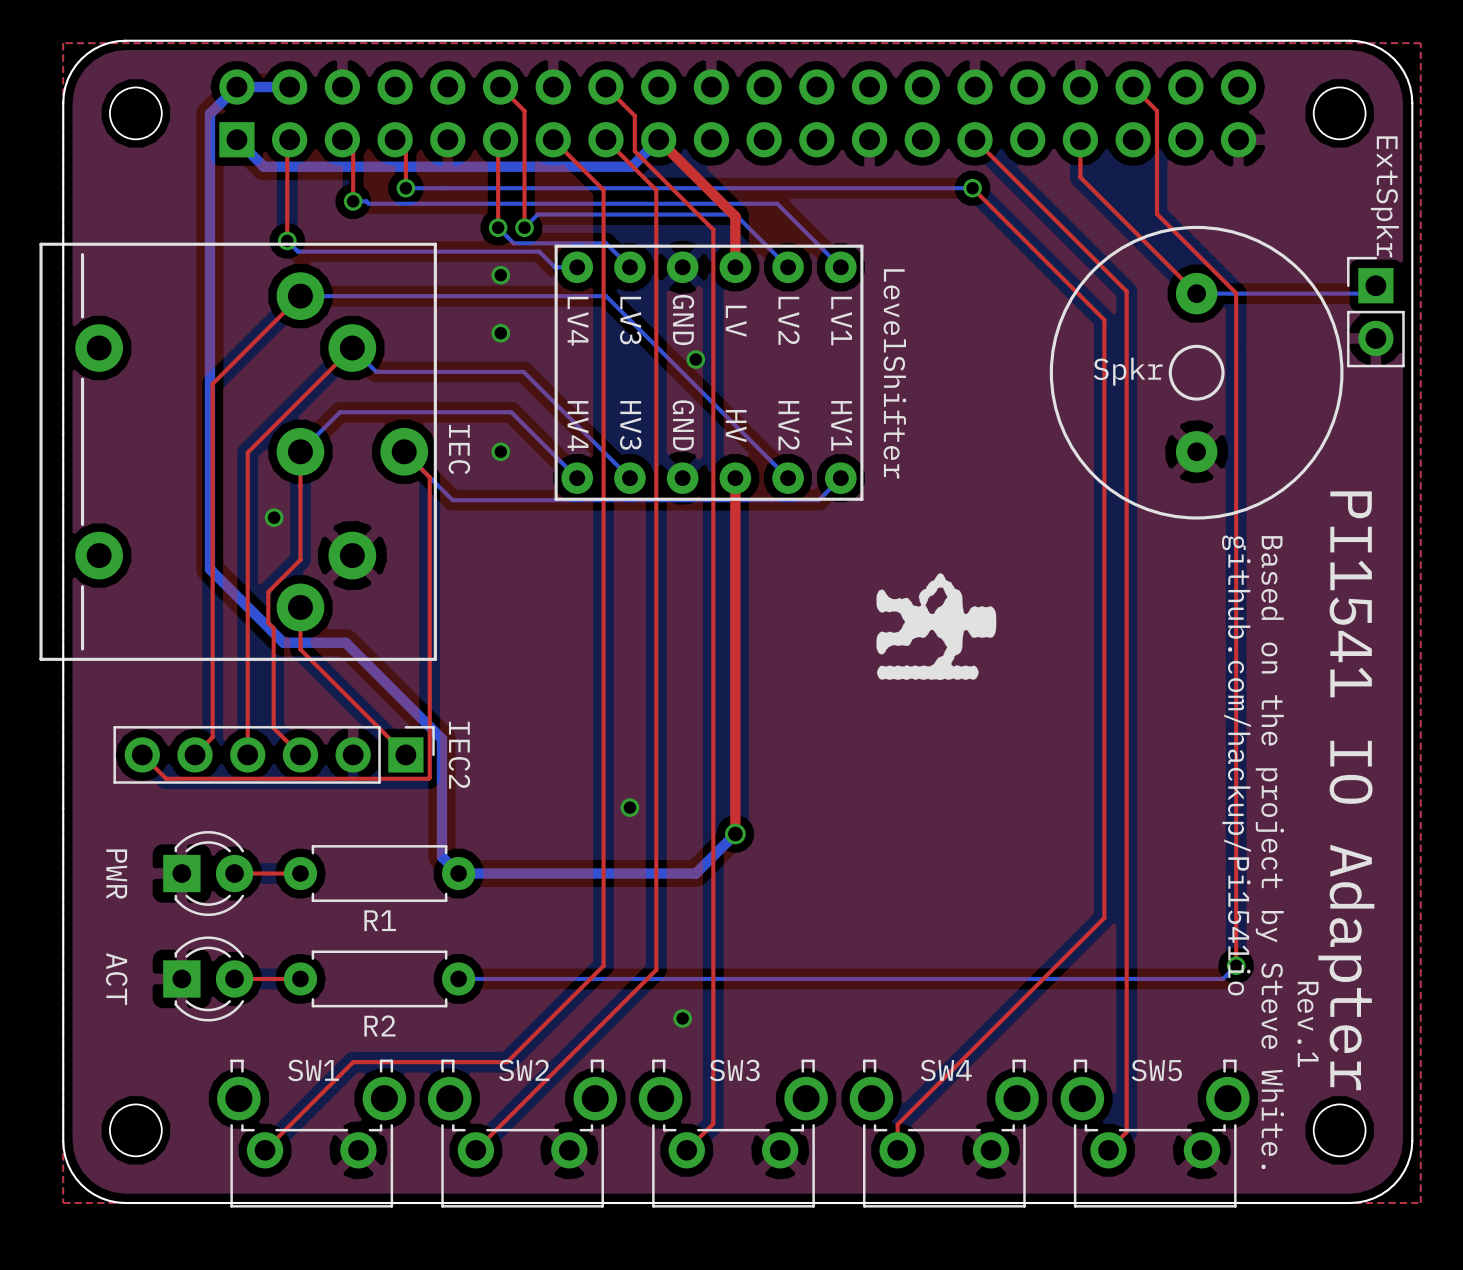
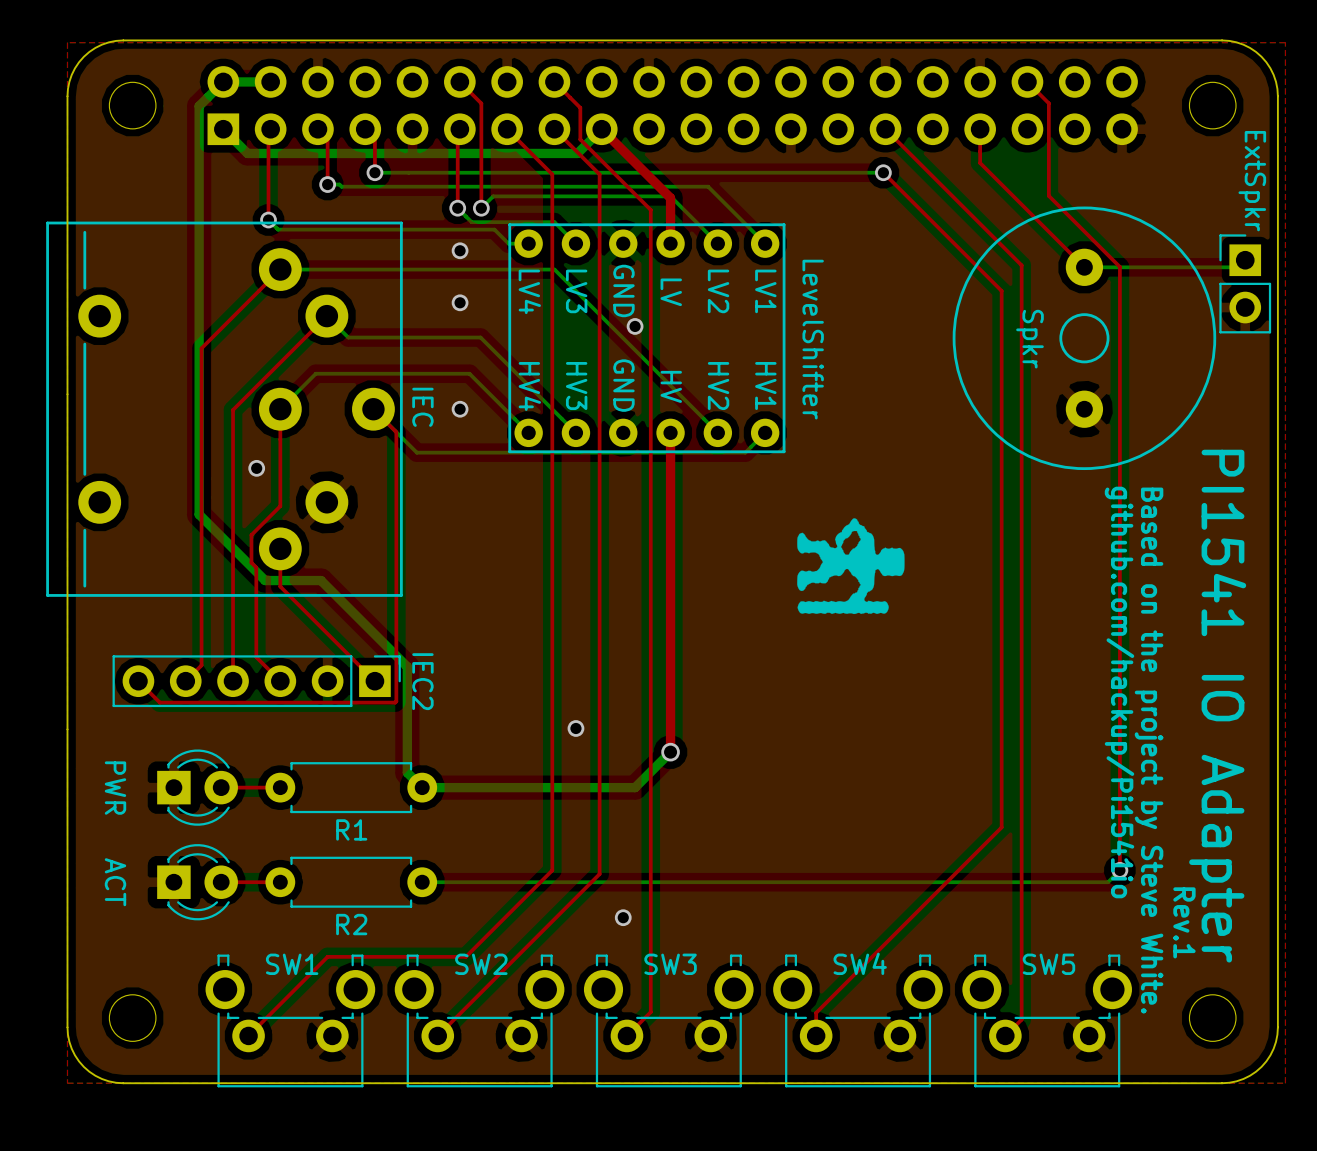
part value rotation: 0° (1128, 371) -> 90° clockwise (1029, 339)

